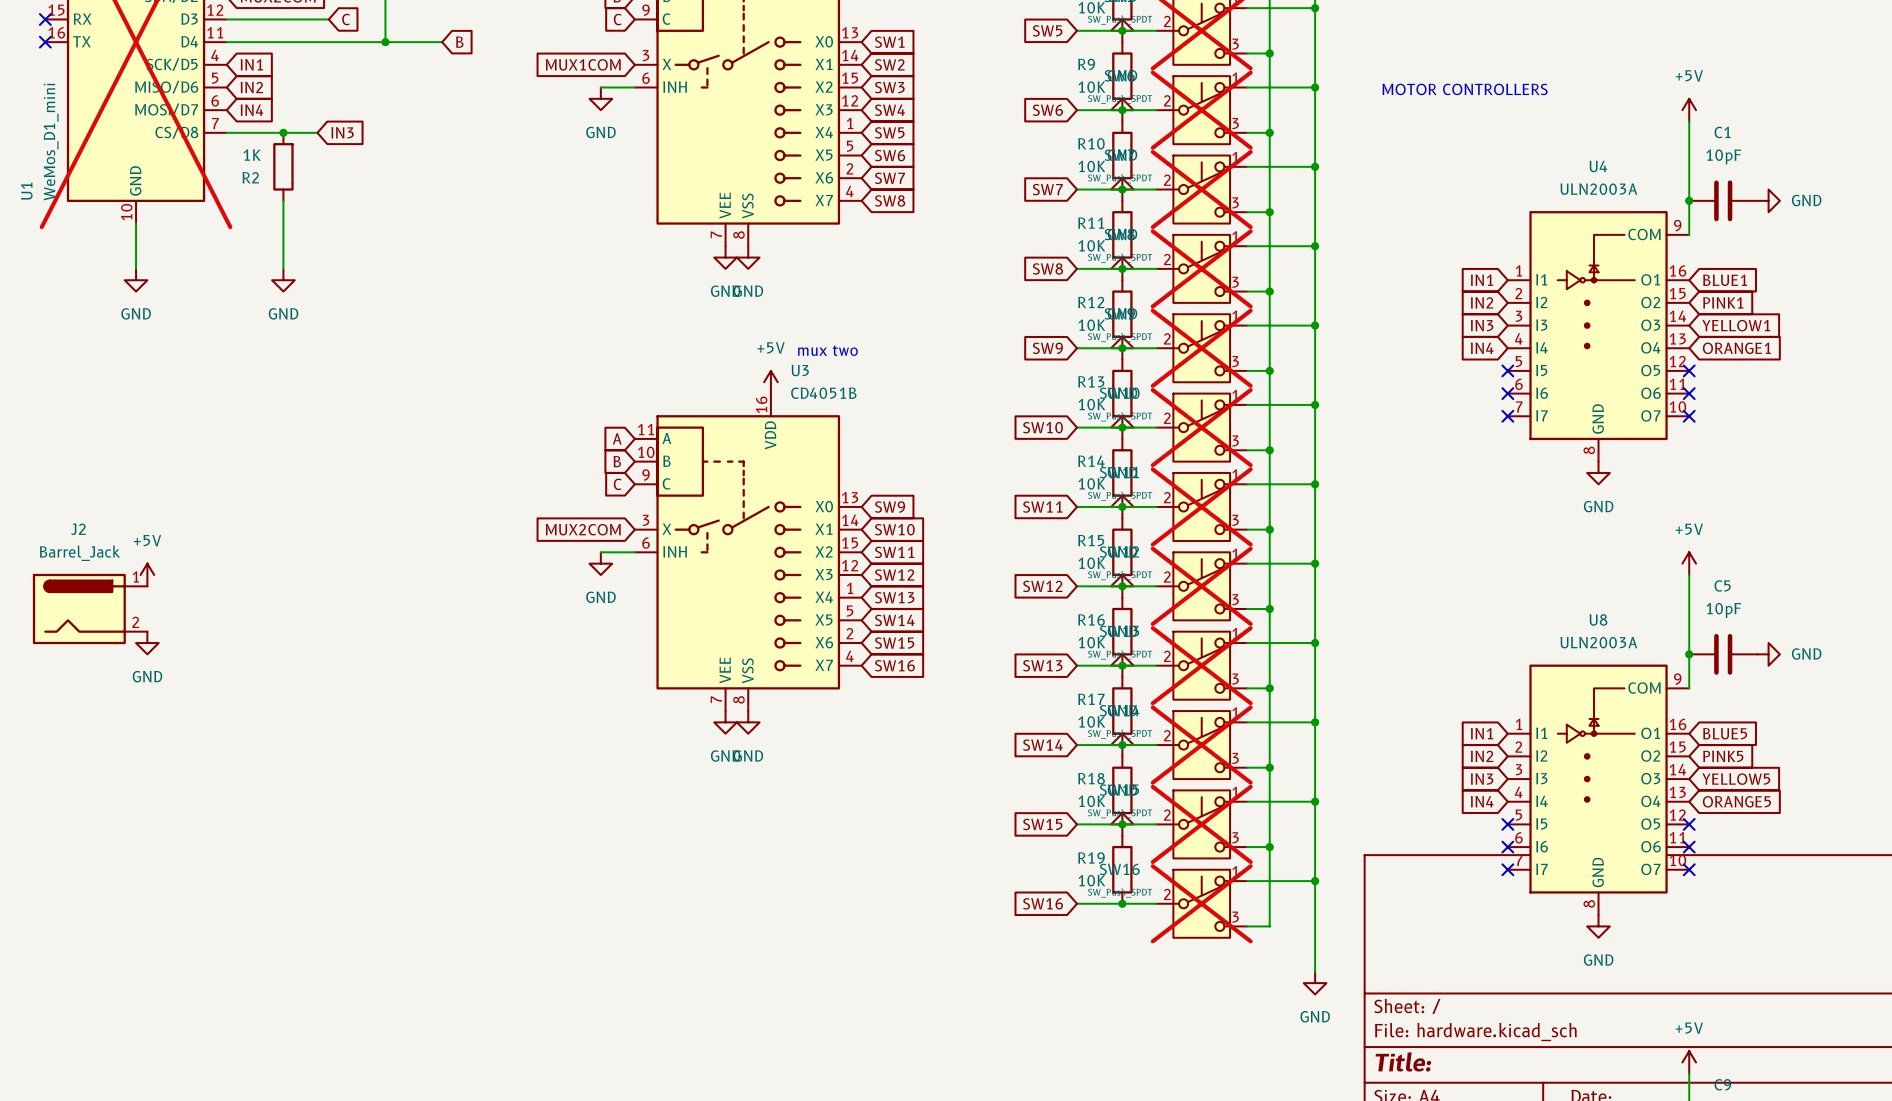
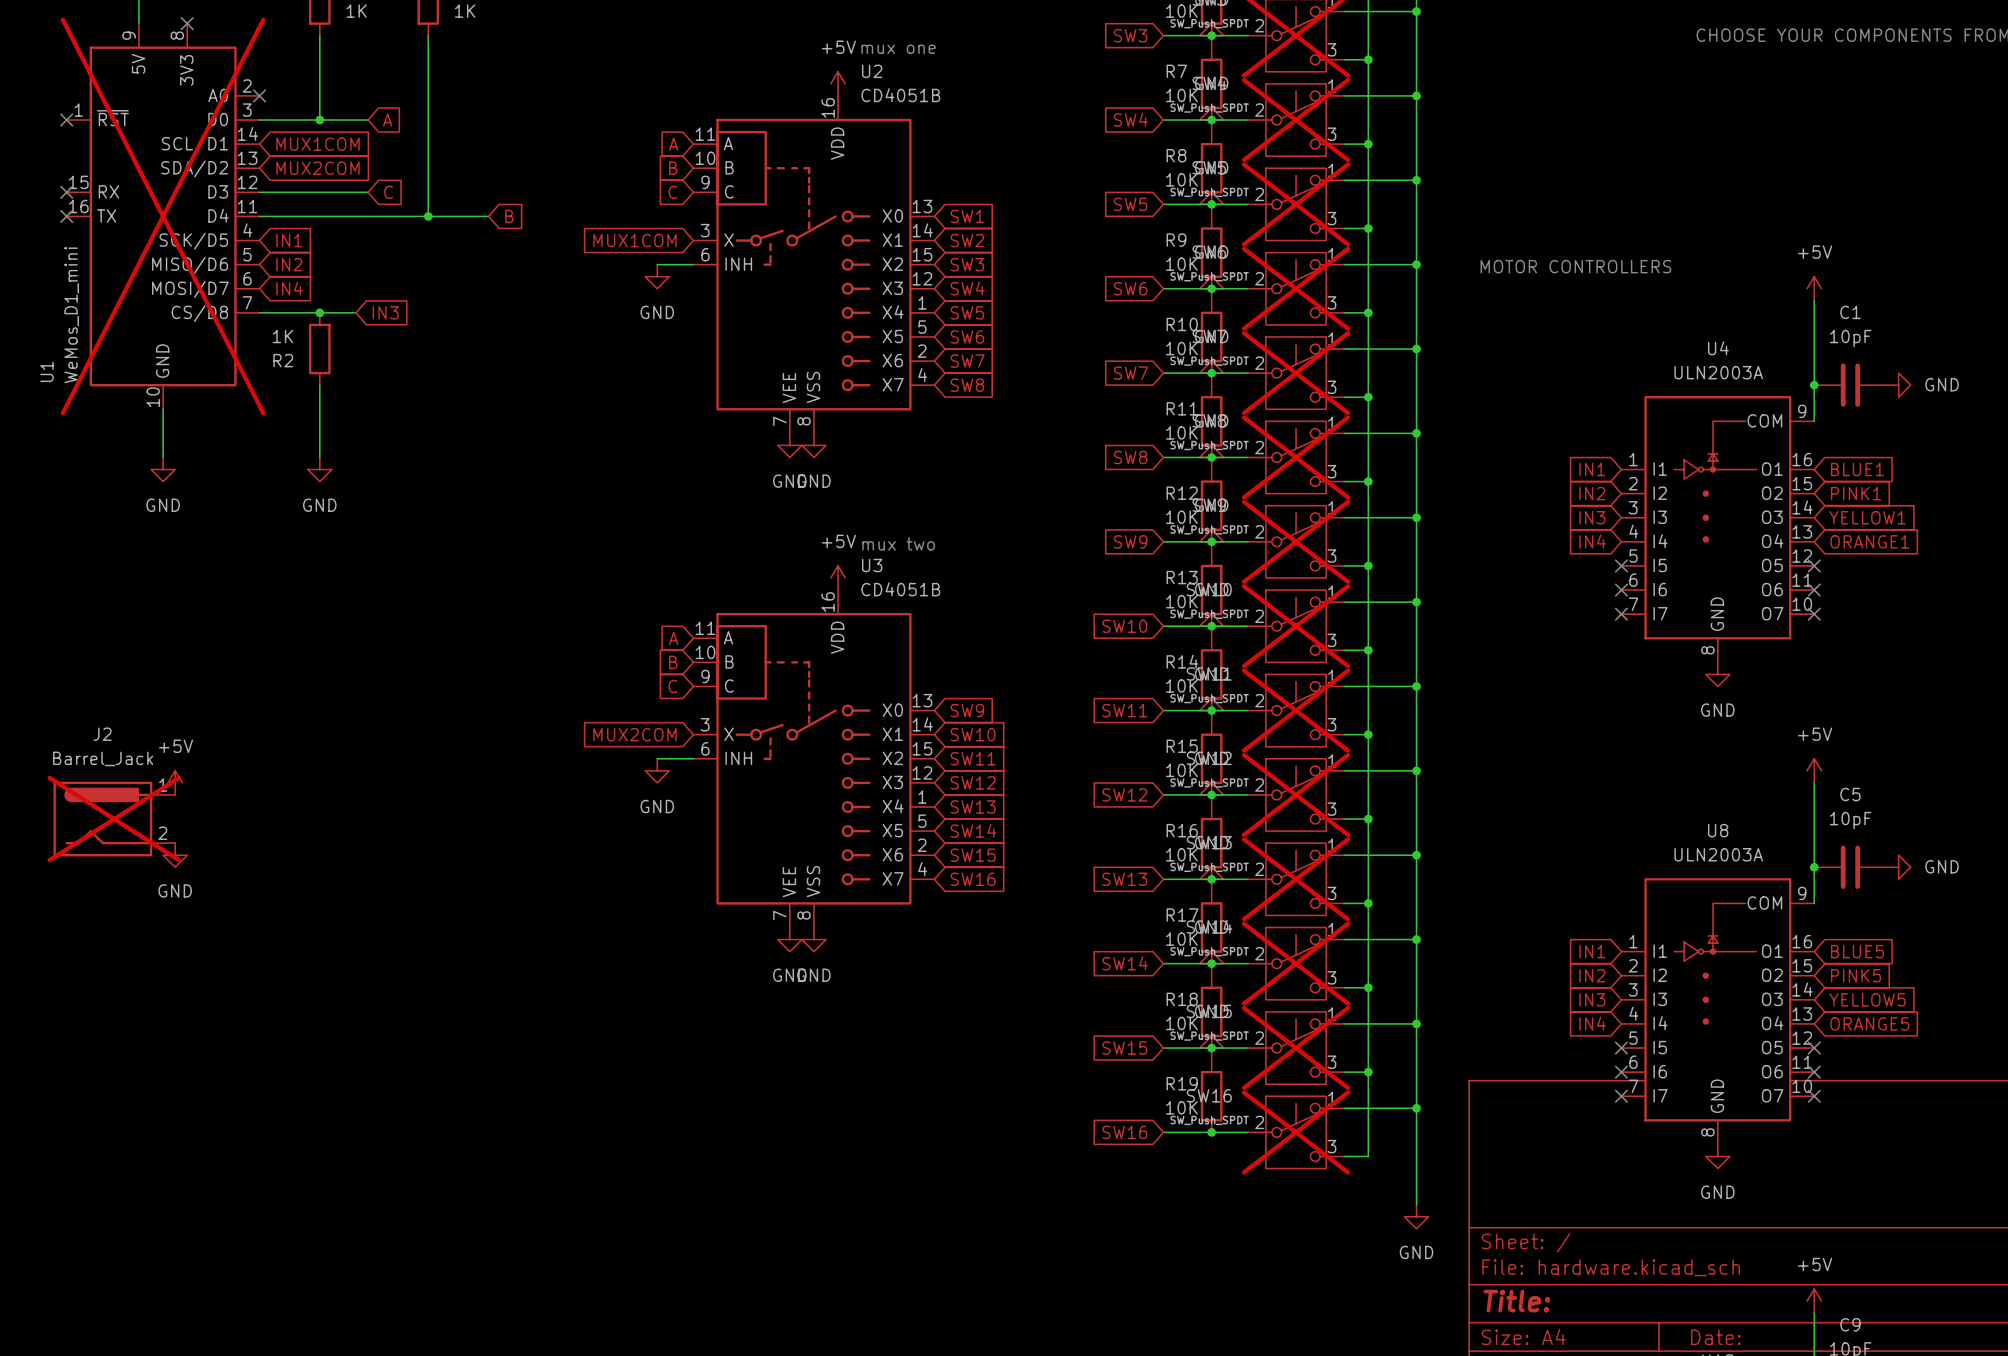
J2 do-not-place cross: none -> (114, 819)

